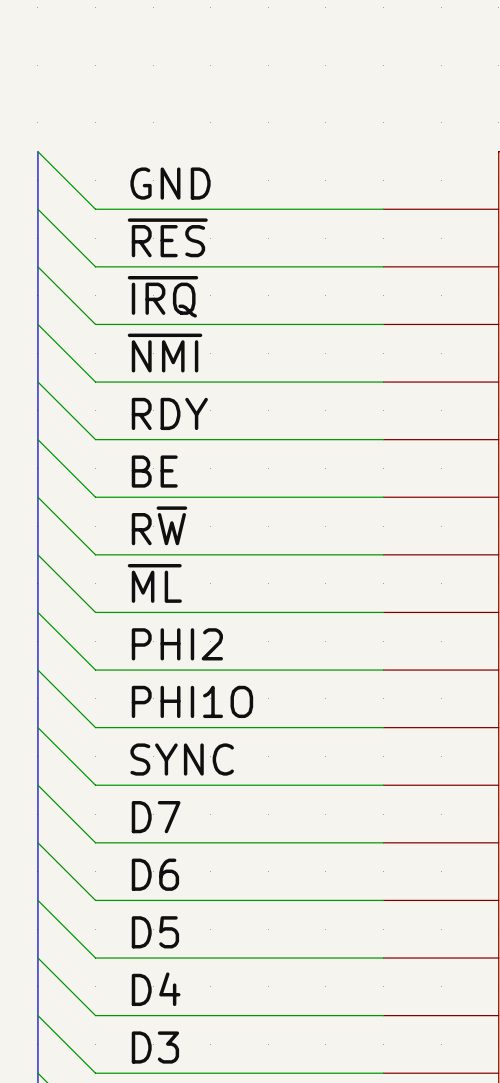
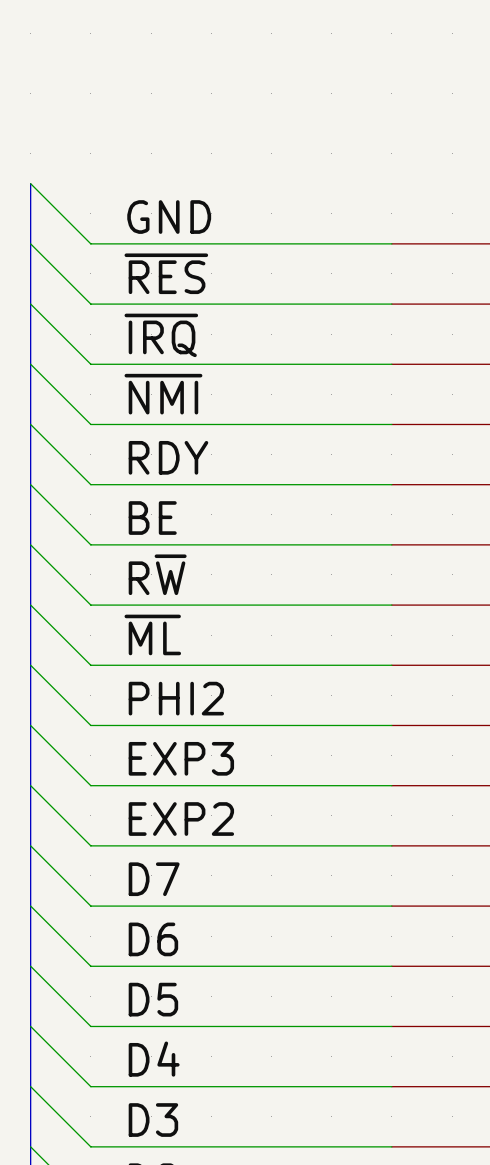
label: PHI1O (192, 701) -> EXP3 (181, 758)
label: SYNC (182, 759) -> EXP2 (181, 819)

